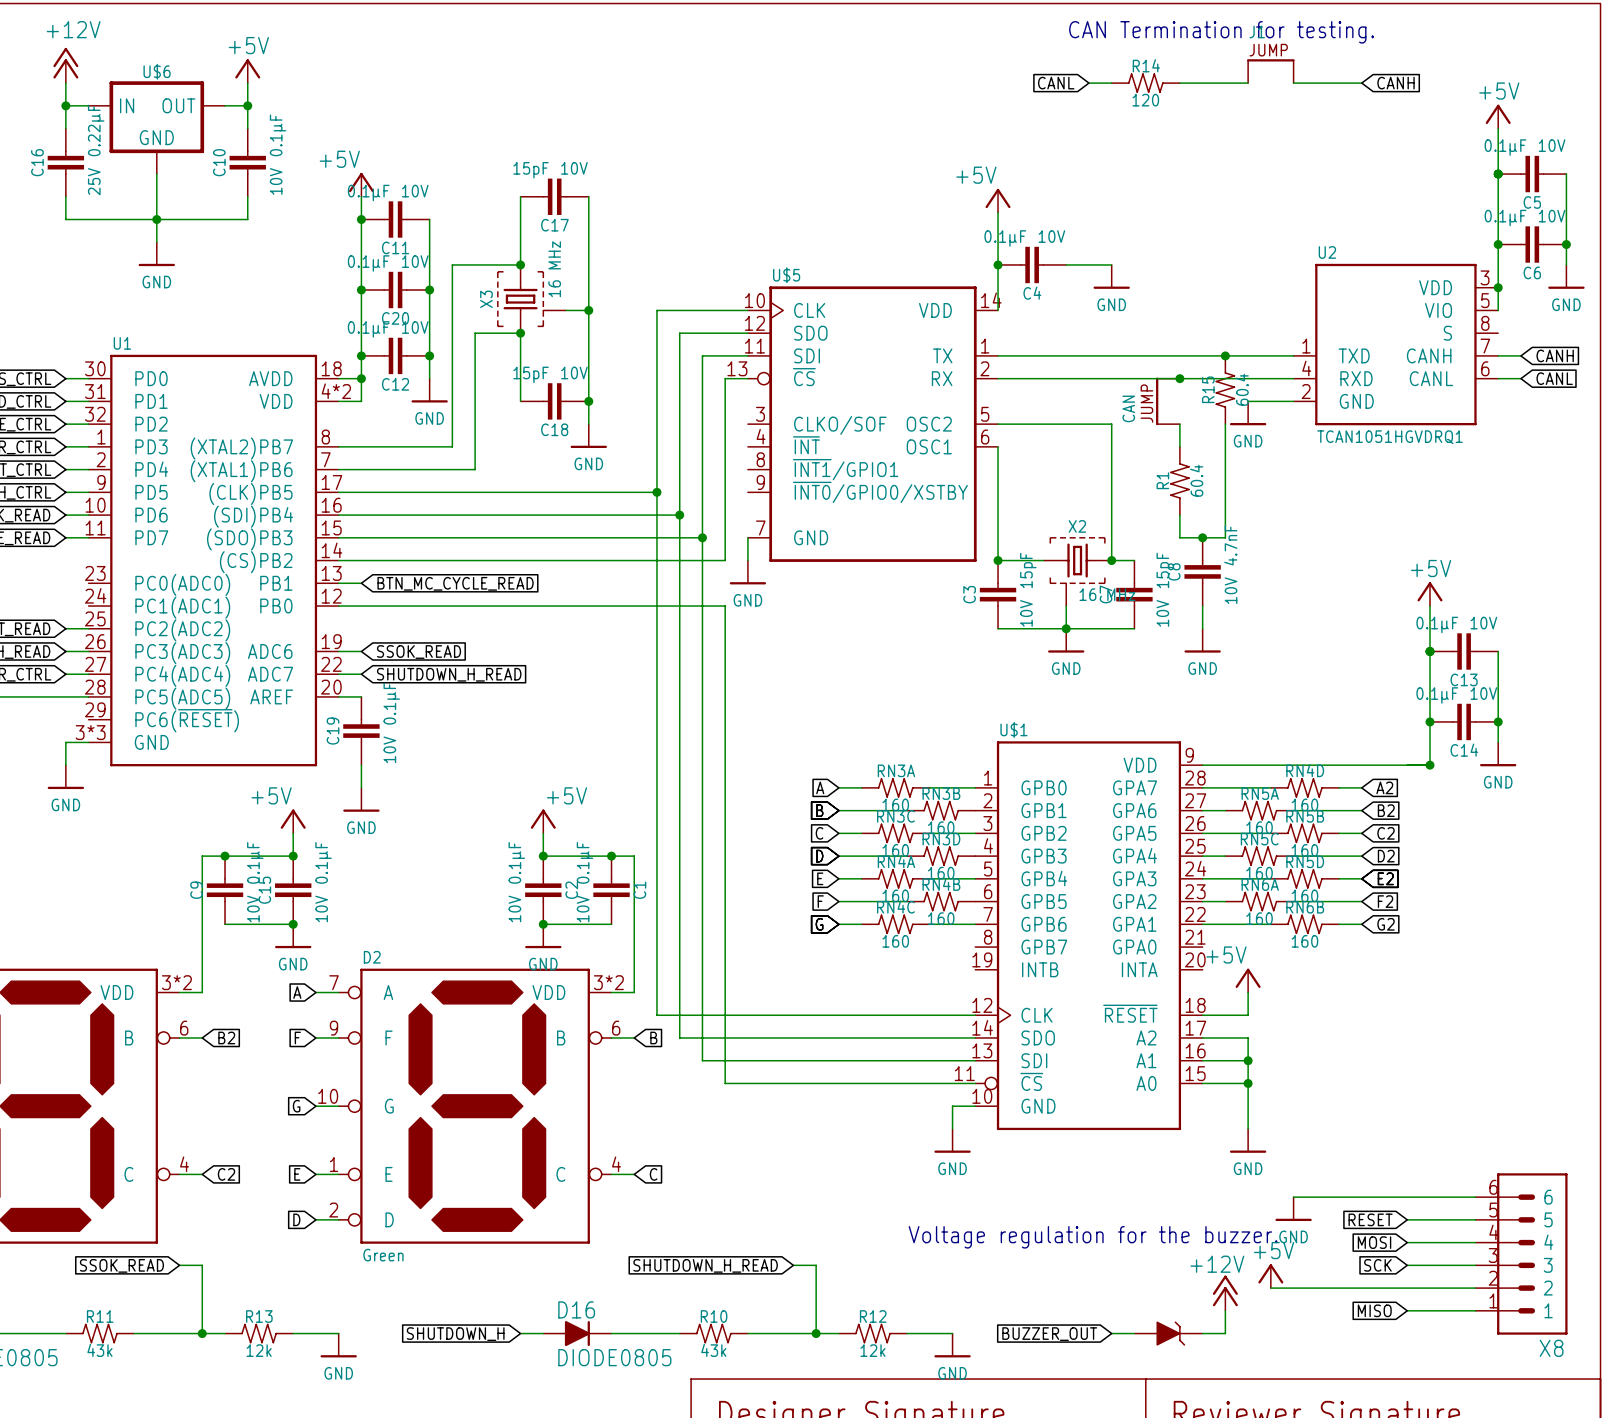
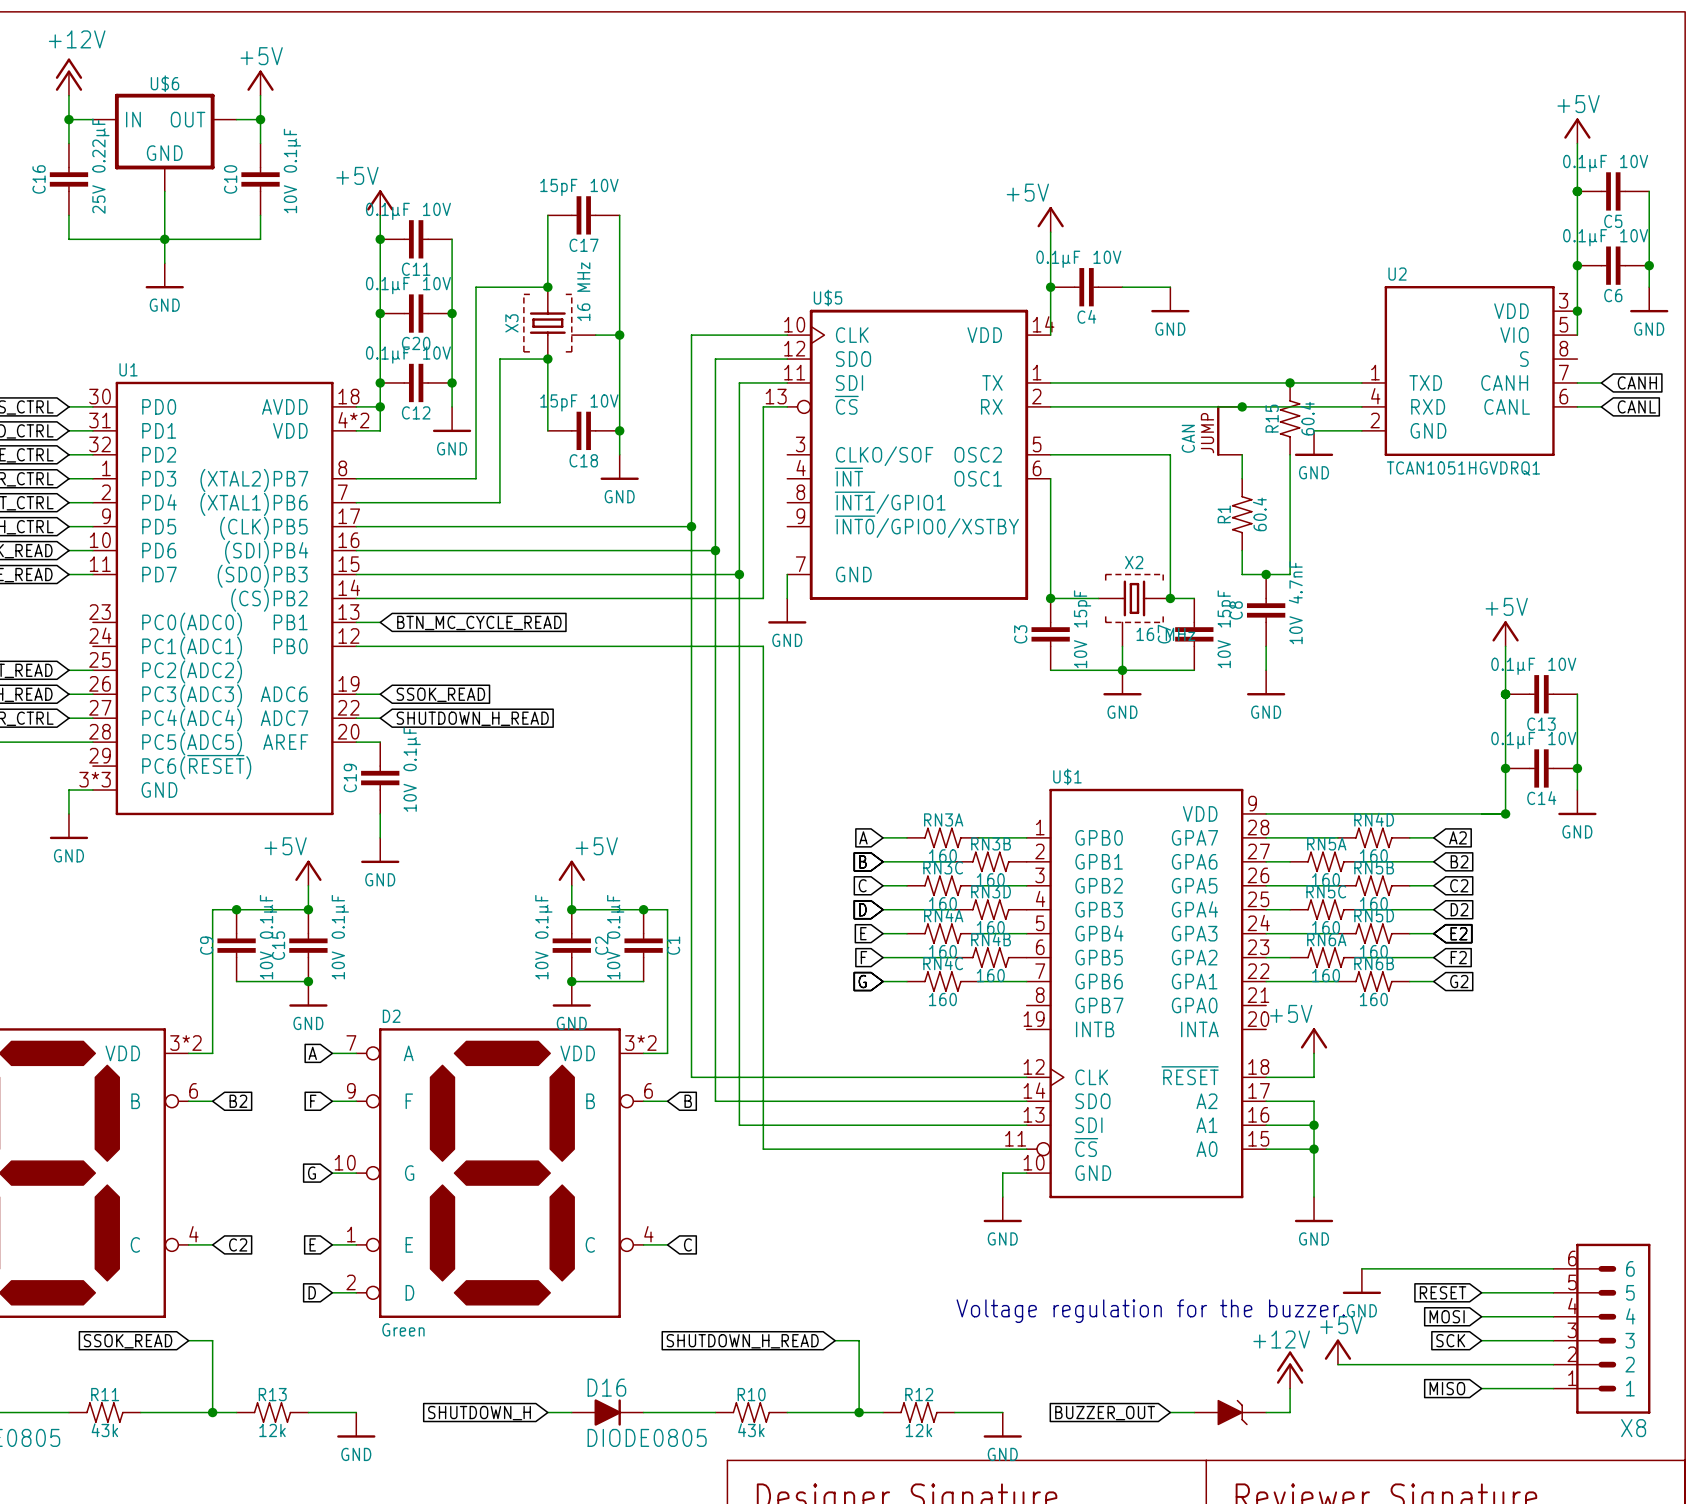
text: CAN Termination for testing. (1221, 32) -> none
J1: (1270, 71) -> none
global label: CANL (1056, 83) -> none
wire: (1088, 83) (1111, 83) -> none
R14: (1145, 83) -> none
wire: (1179, 83) (1248, 83) -> none
wire: (1293, 83) (1361, 83) -> none
global label: CANH (1396, 83) -> none

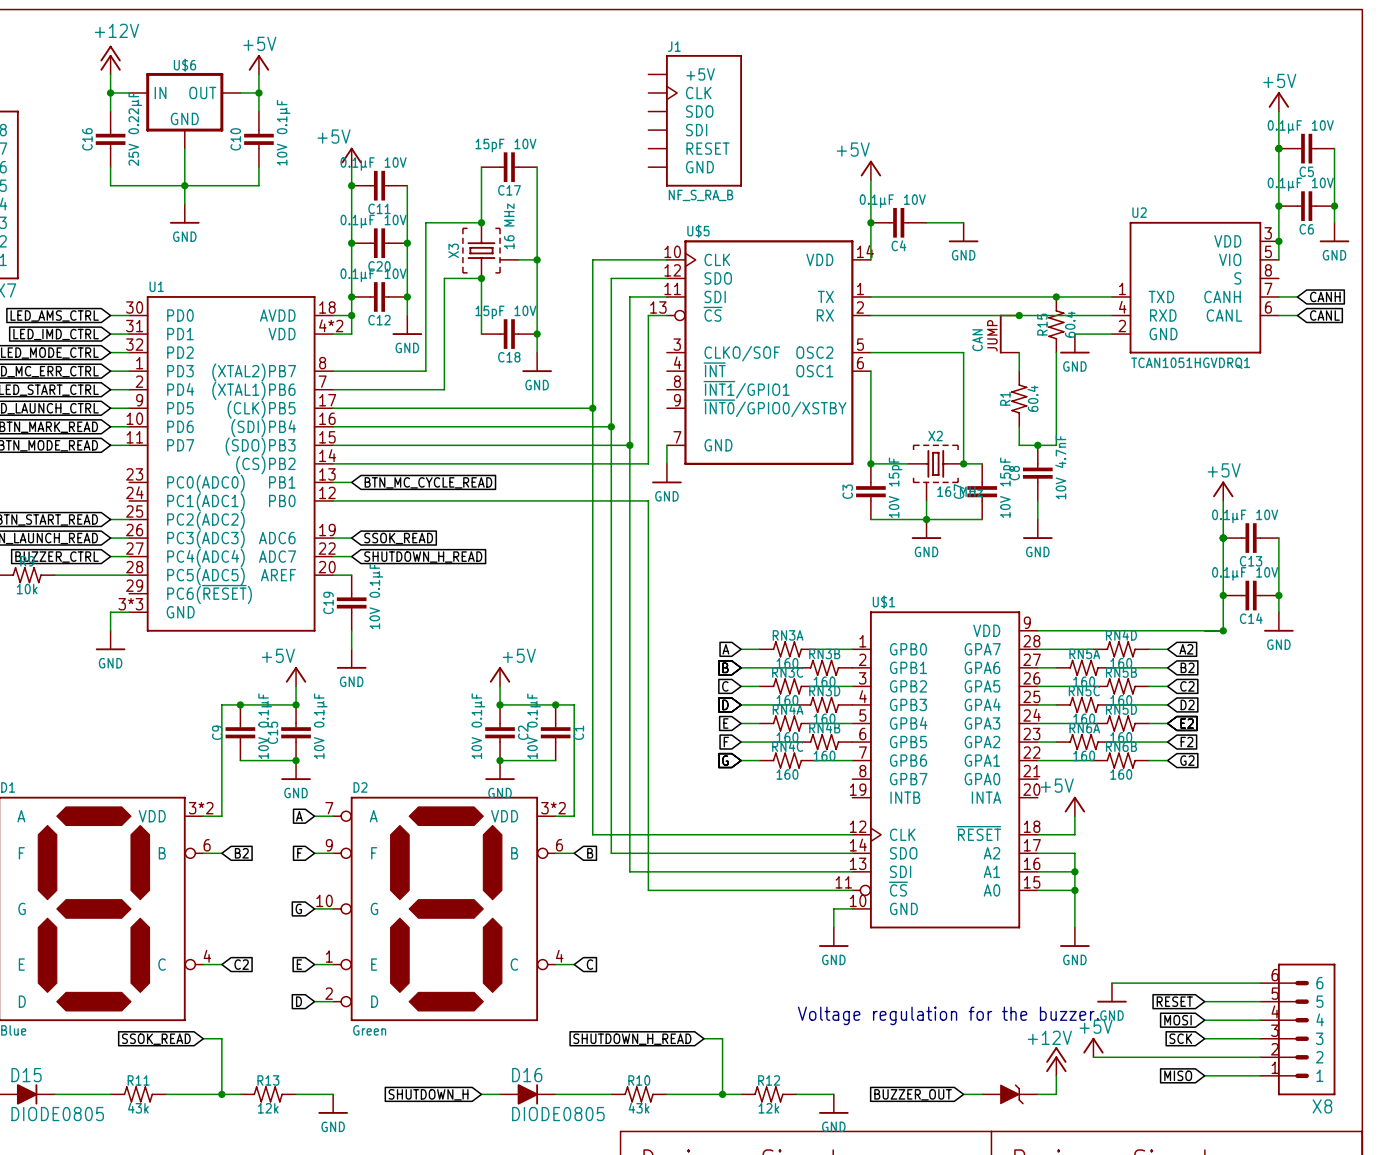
J1: none -> (695, 120)

